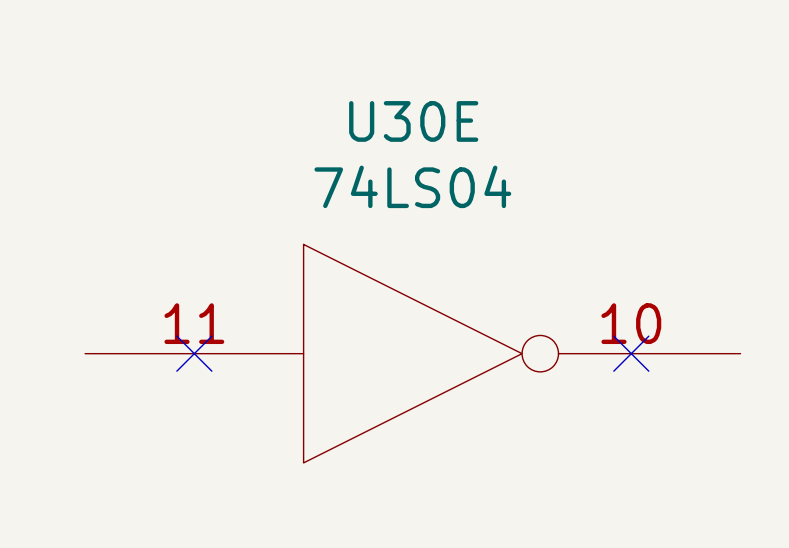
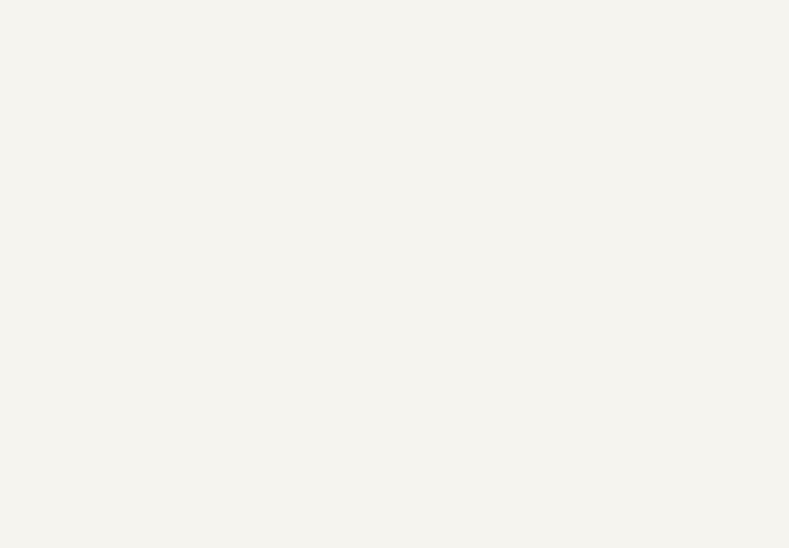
no-connect mark: (194, 353) -> none
U30E: 74LS04 (412, 353) -> none
no-connect mark: (631, 353) -> none

